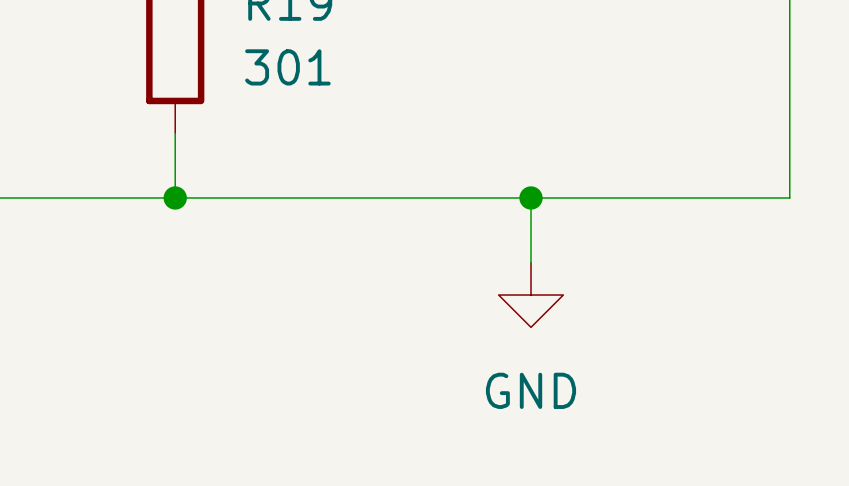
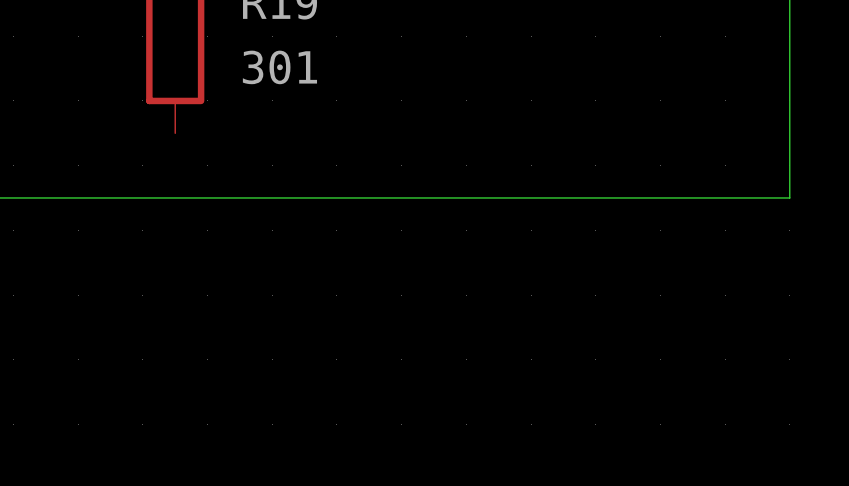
wire: (175, 133) (175, 197) -> none
junction: (175, 197) -> none
wire: (531, 197) (531, 262) -> none
junction: (531, 197) -> none
power symbol: GND (531, 295) -> none

